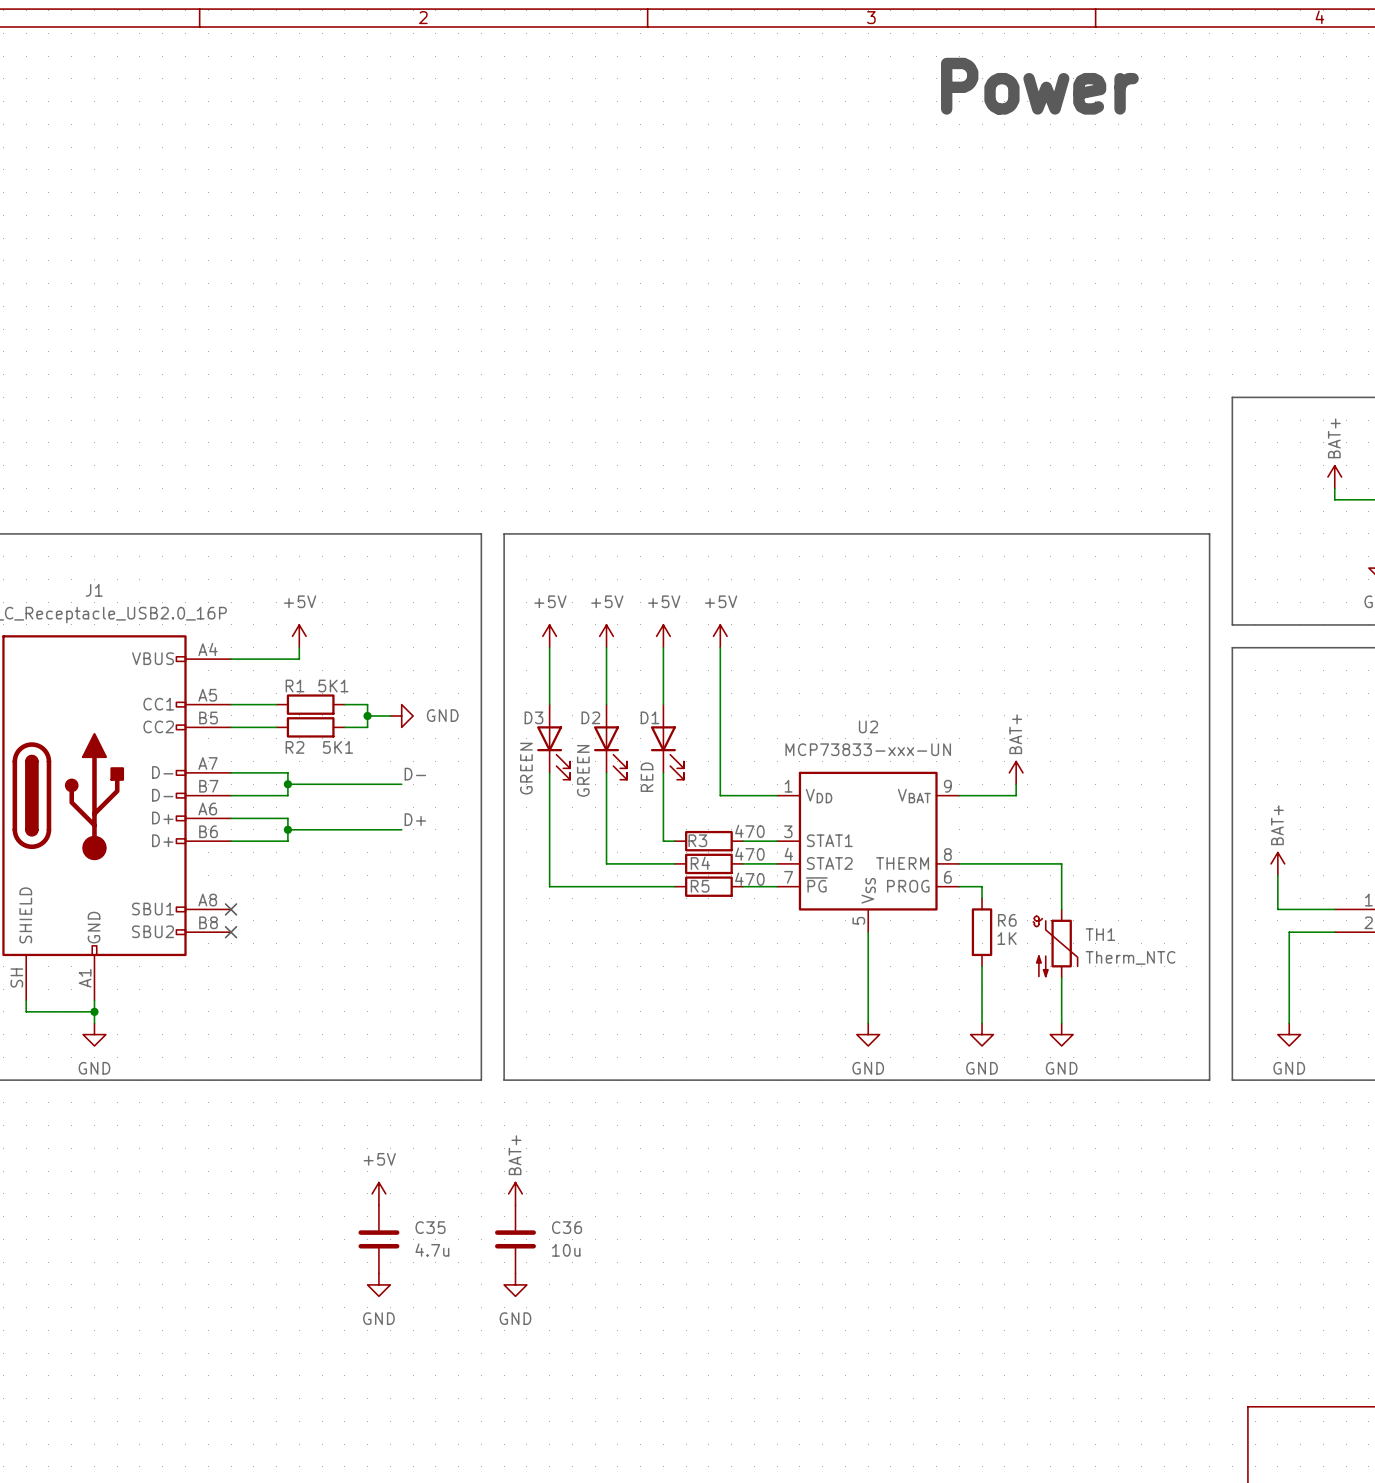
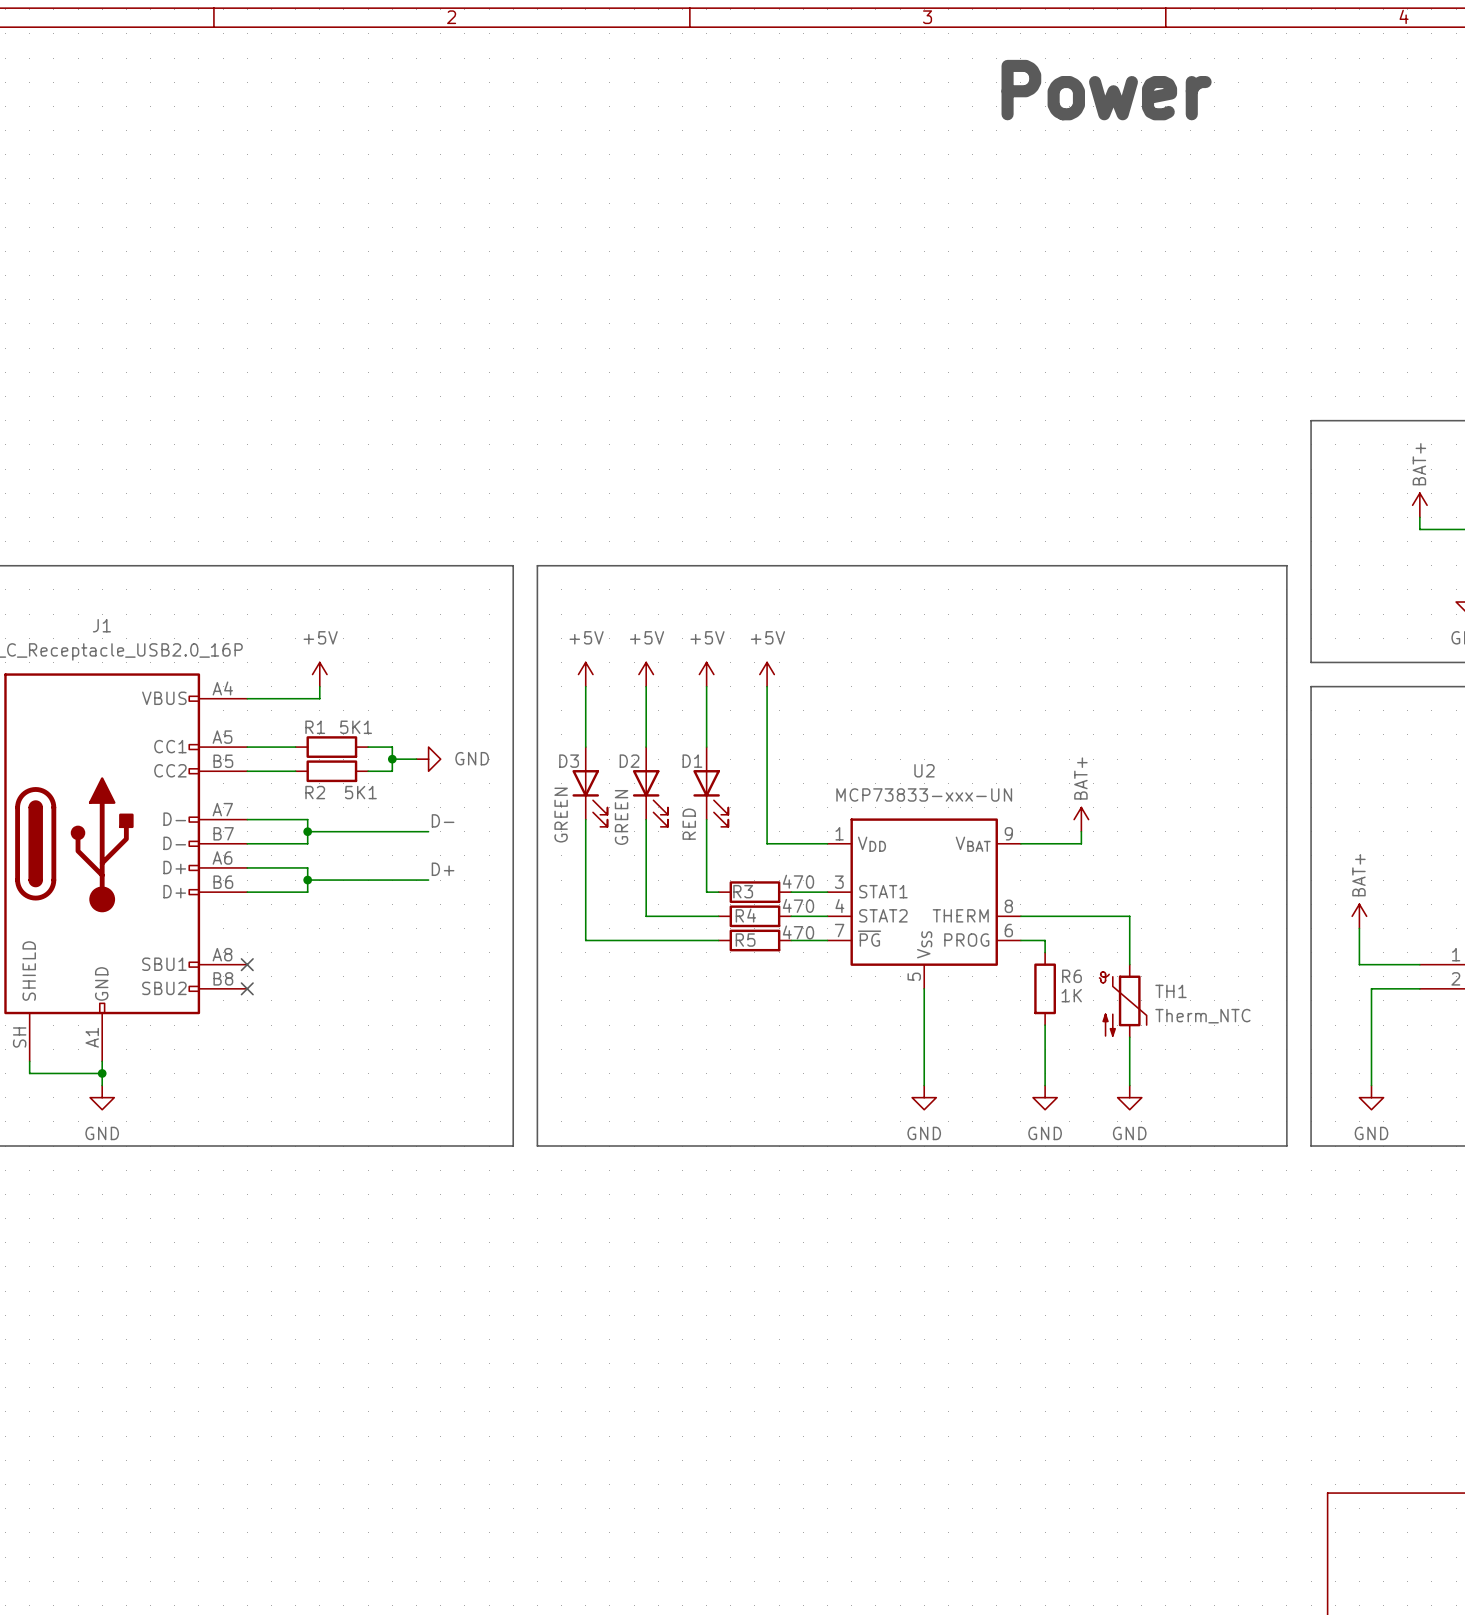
power symbol: +5V (378, 1193) -> none
power symbol: BAT+ (515, 1193) -> none
C35: 4.7u (378, 1239) -> none
C36: 10u (515, 1239) -> none
power symbol: GND (378, 1284) -> none
power symbol: GND (515, 1284) -> none

